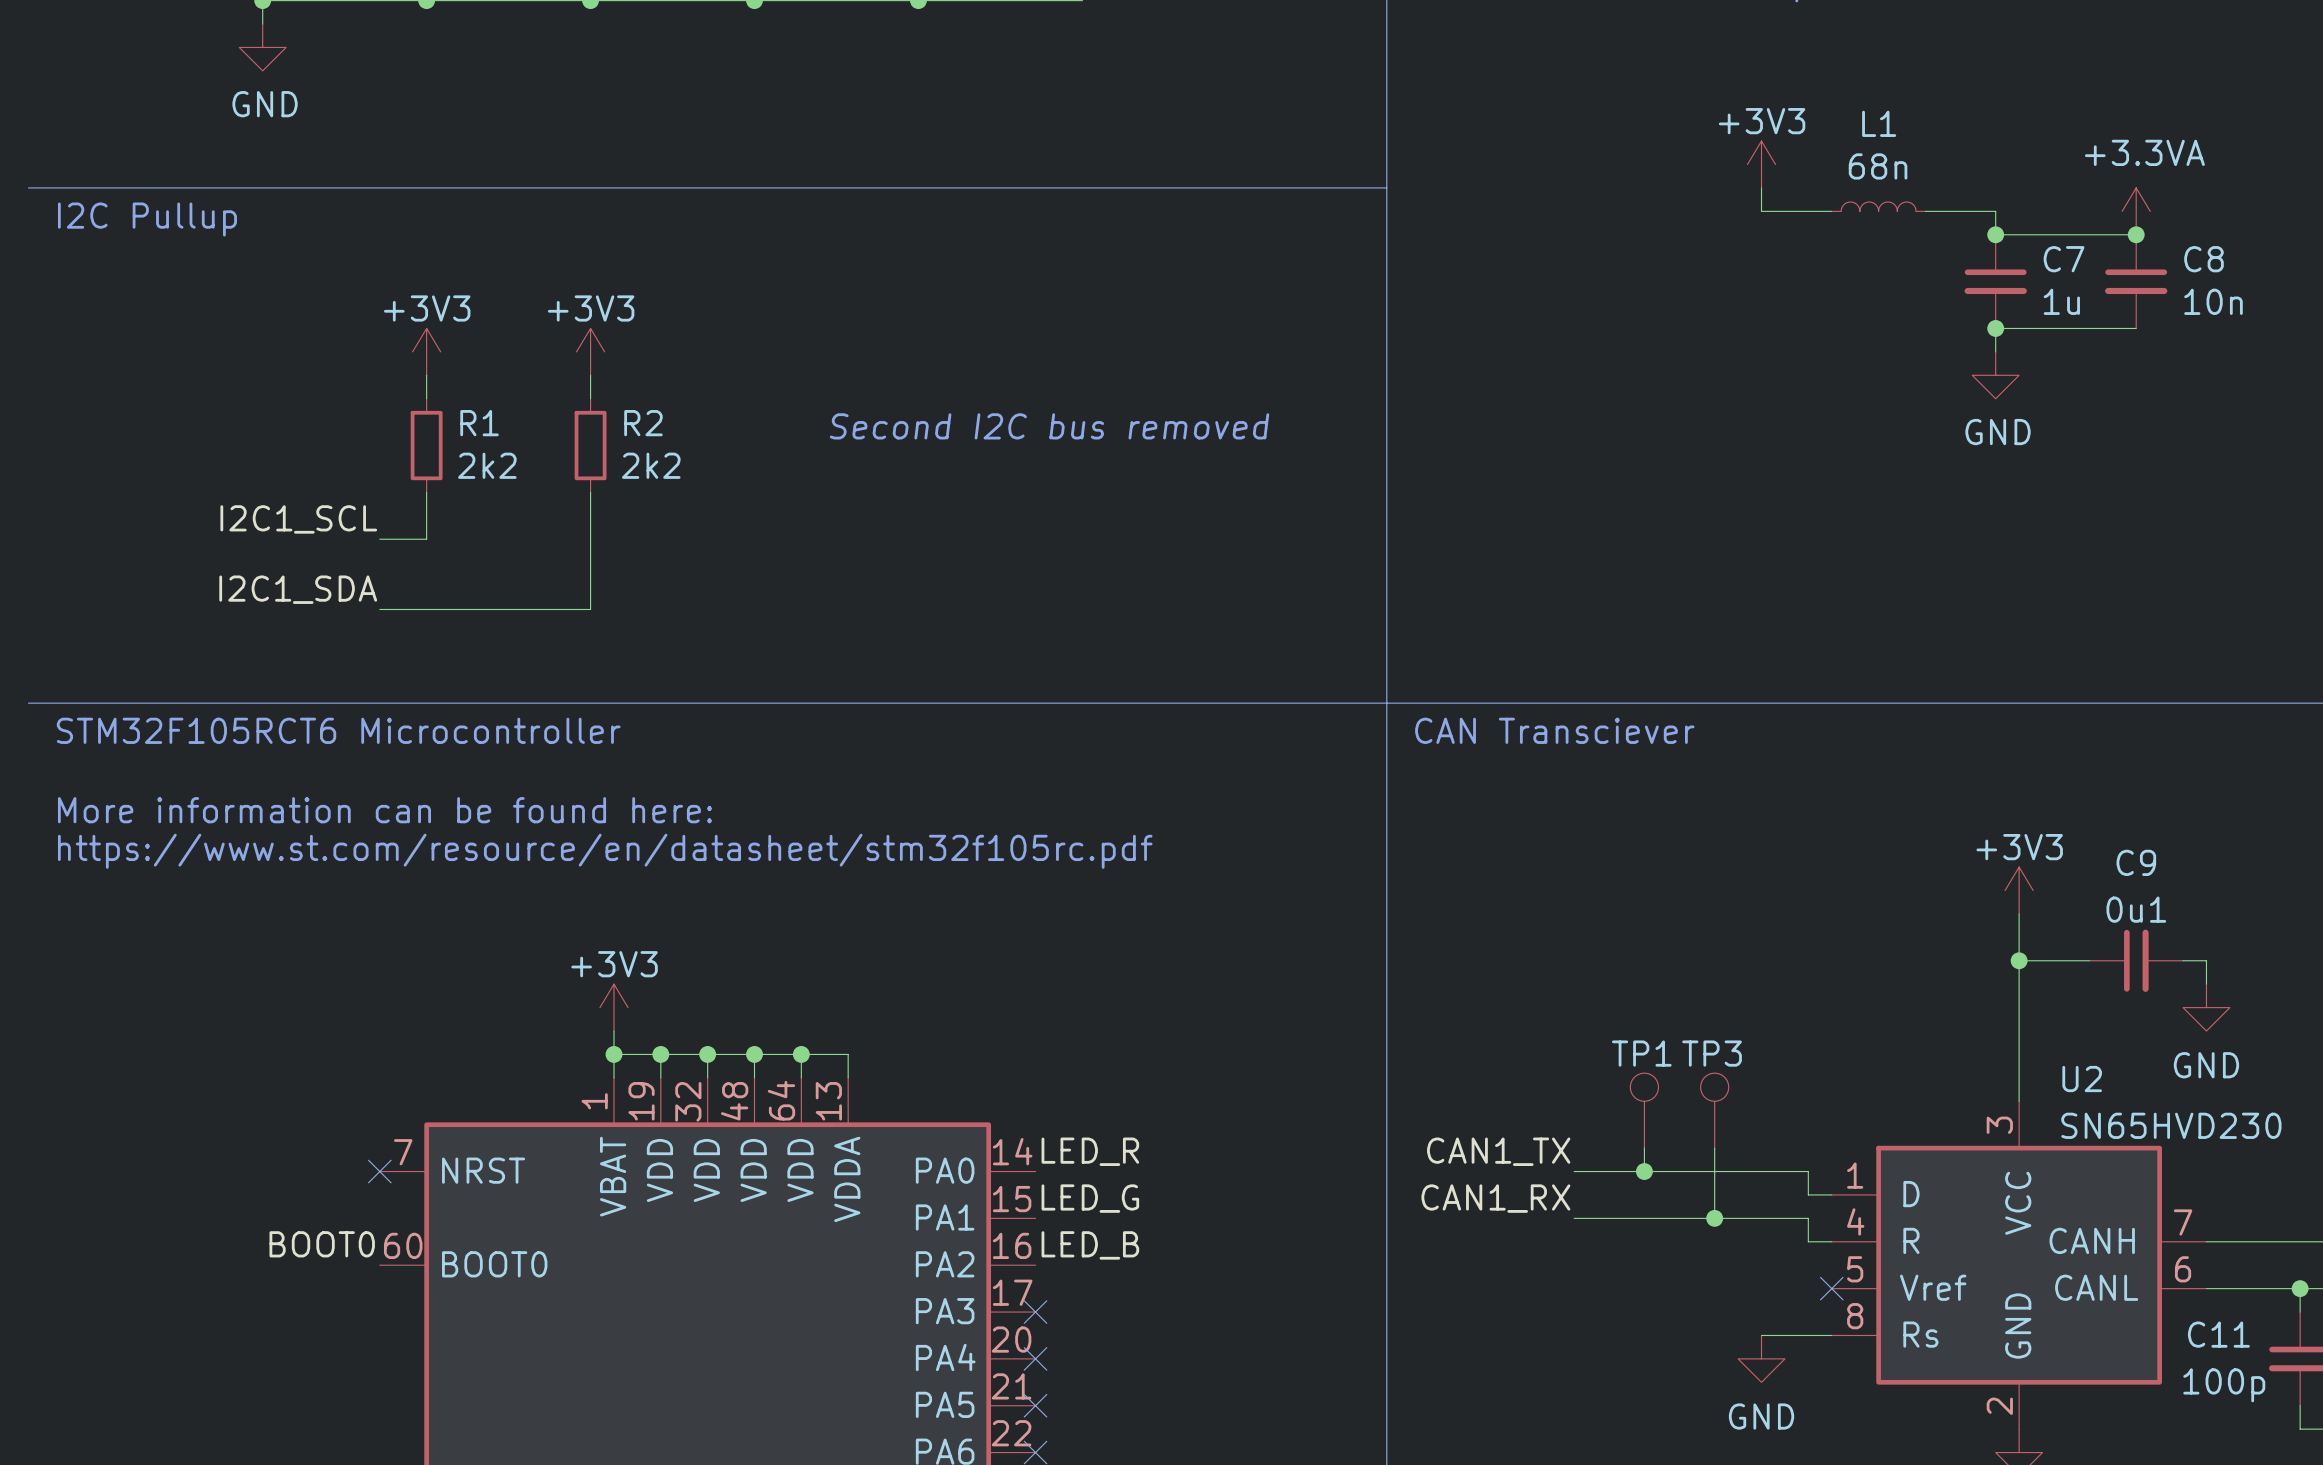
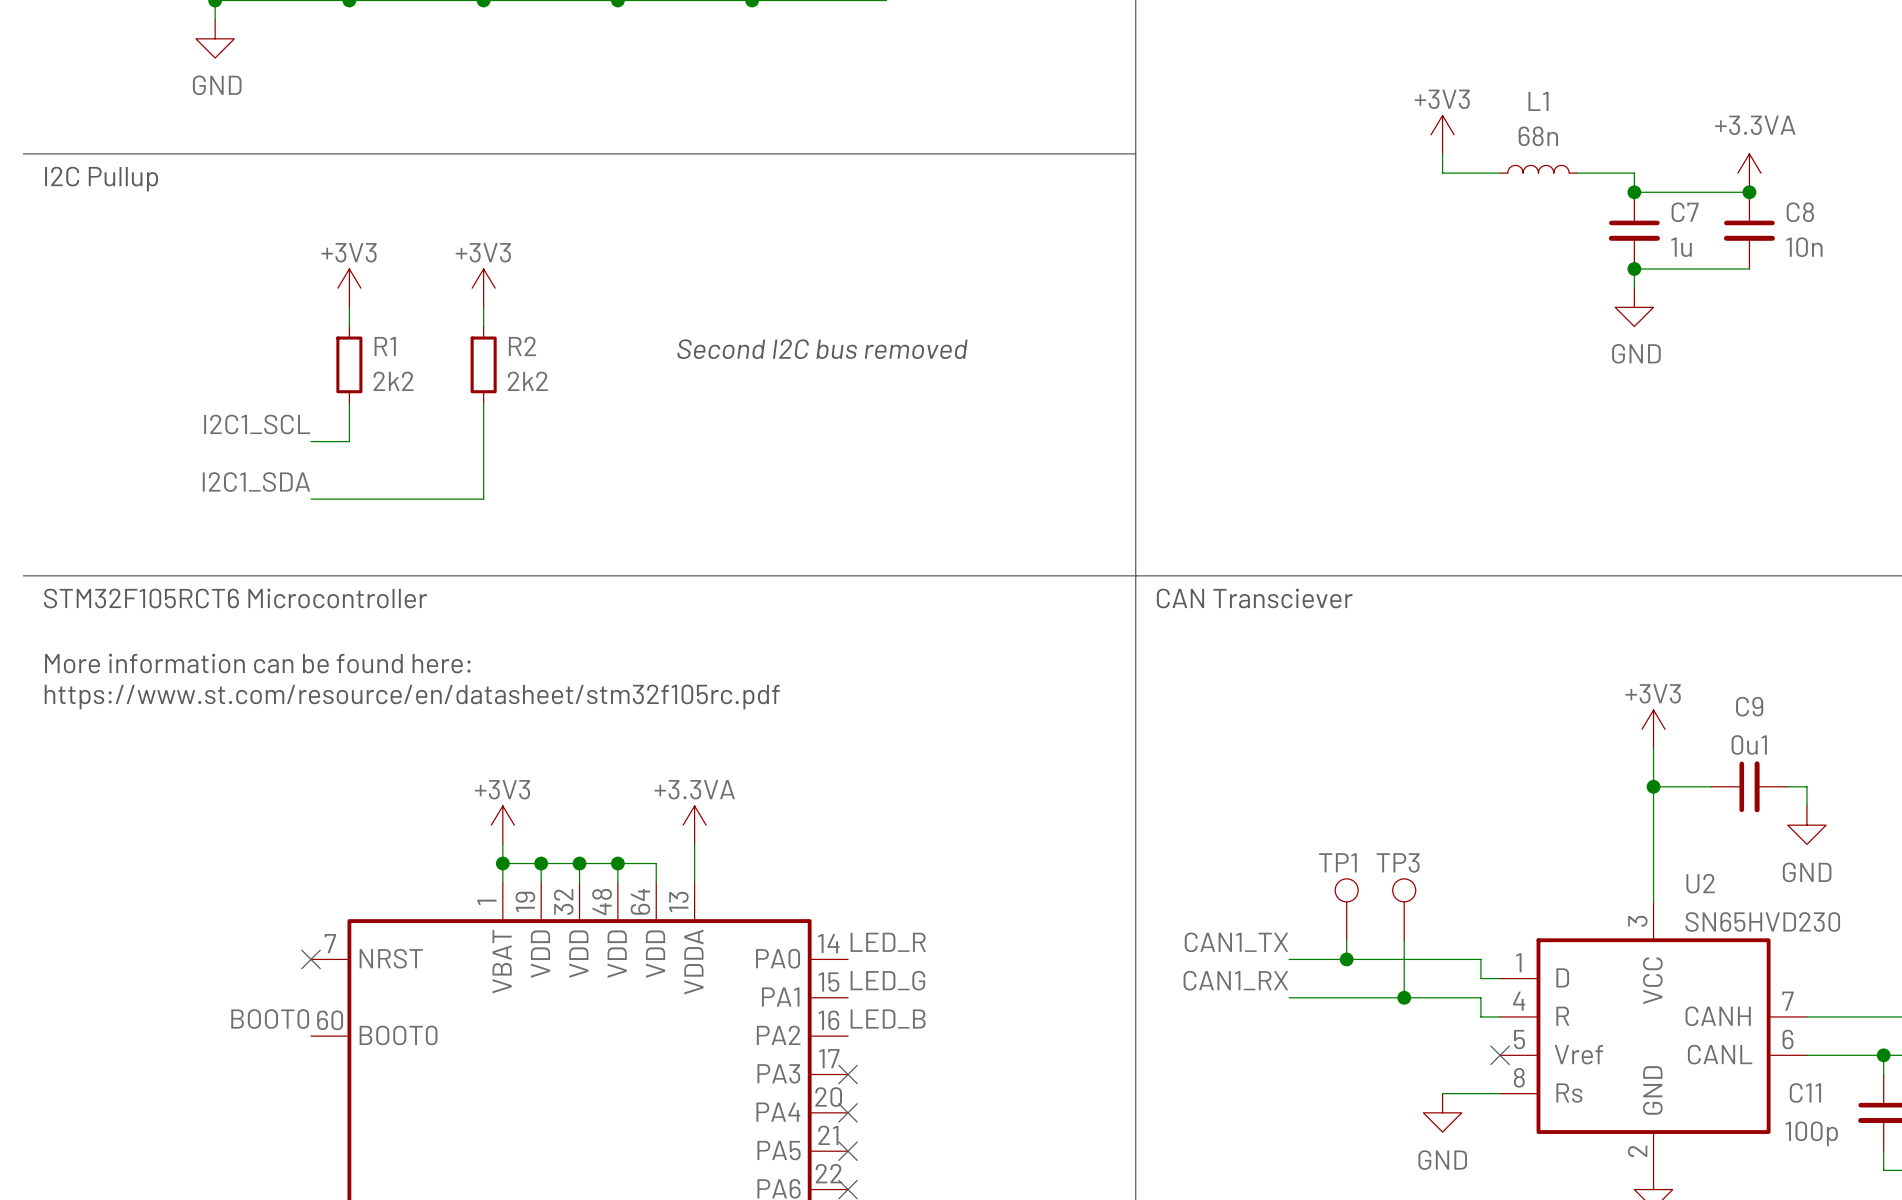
power symbol: none -> +3.3VA (694, 825)
wire: (801, 1054) (848, 1054) -> (694, 844) (694, 863)
junction: (801, 1054) -> none

